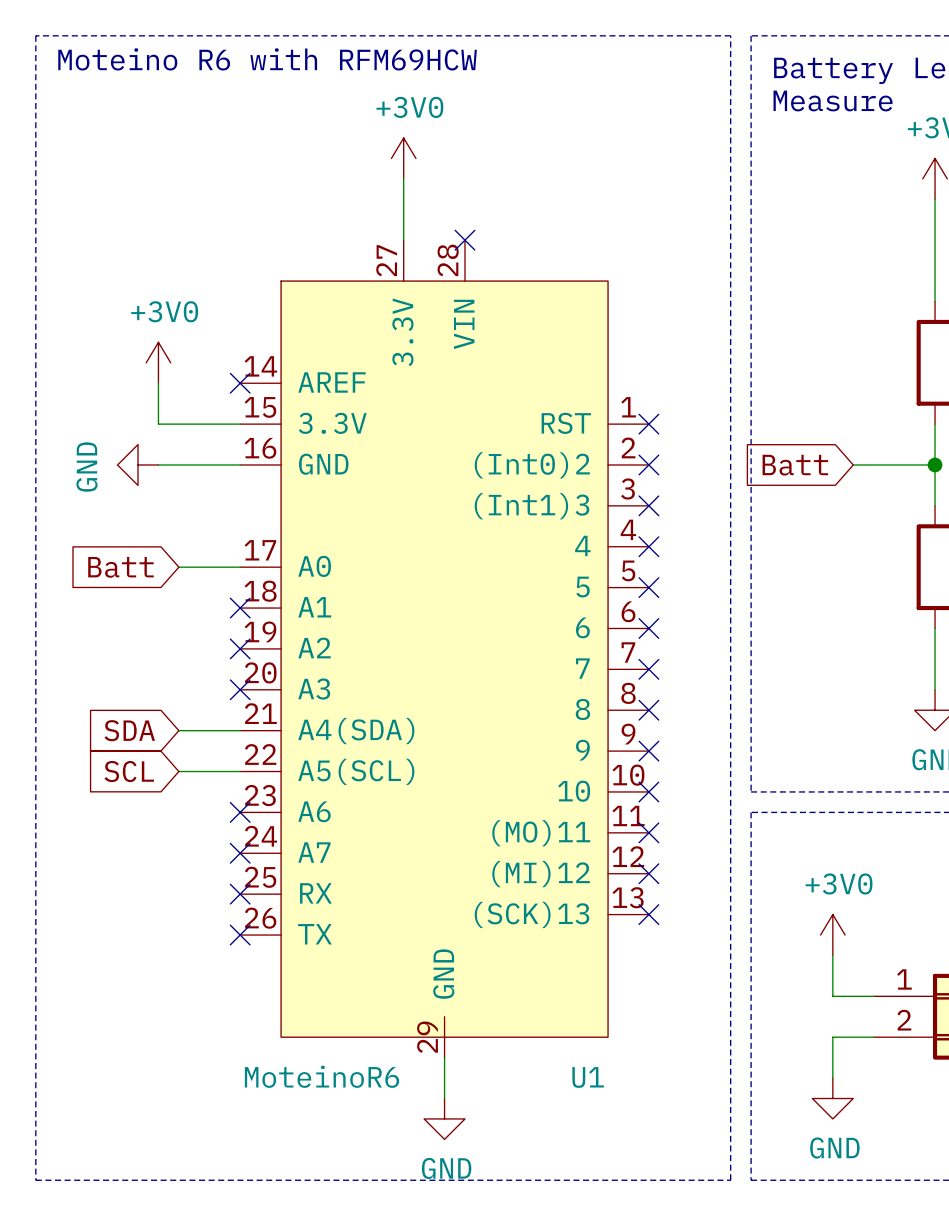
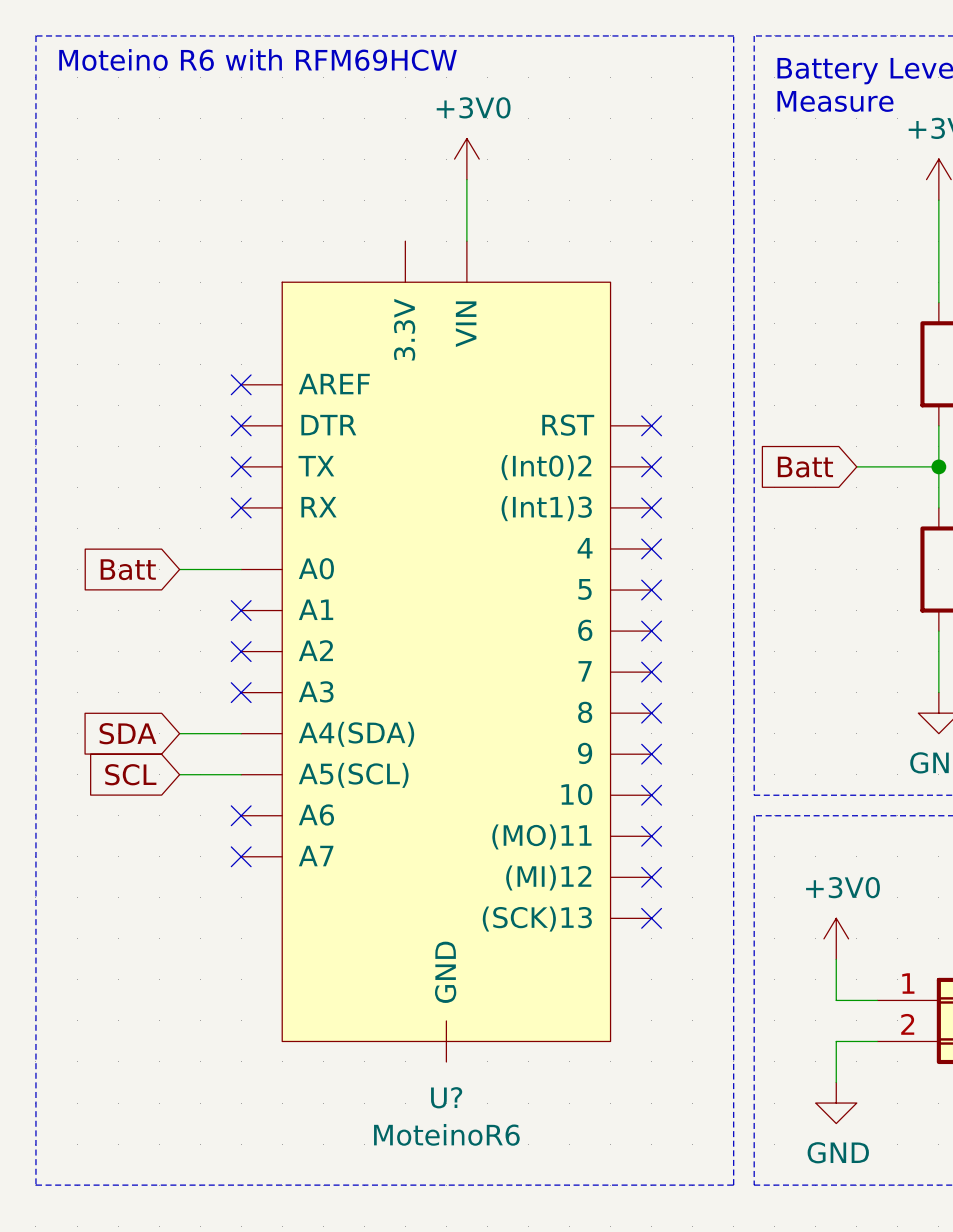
power symbol position: +3V0 (403, 158) -> +3V0 (466, 159)
wire: (403, 178) (403, 240) -> (466, 179) (466, 241)
no-connect mark: (464, 240) -> none
power symbol: +3V0 (158, 362) -> none
wire: (158, 383) (158, 424) (240, 424) -> none
no-connect mark: none -> (241, 425)
power symbol: GND (138, 464) -> none
wire: (158, 464) (240, 464) -> none
no-connect mark: none -> (241, 466)
no-connect mark: none -> (241, 507)
U1: MoteinoR6 (444, 648) -> none
U?: none -> MoteinoR6 (446, 651)
no-connect mark: (240, 894) -> none
no-connect mark: (240, 935) -> none
wire: (444, 1057) (444, 1098) -> none
power symbol: GND (444, 1118) -> none

